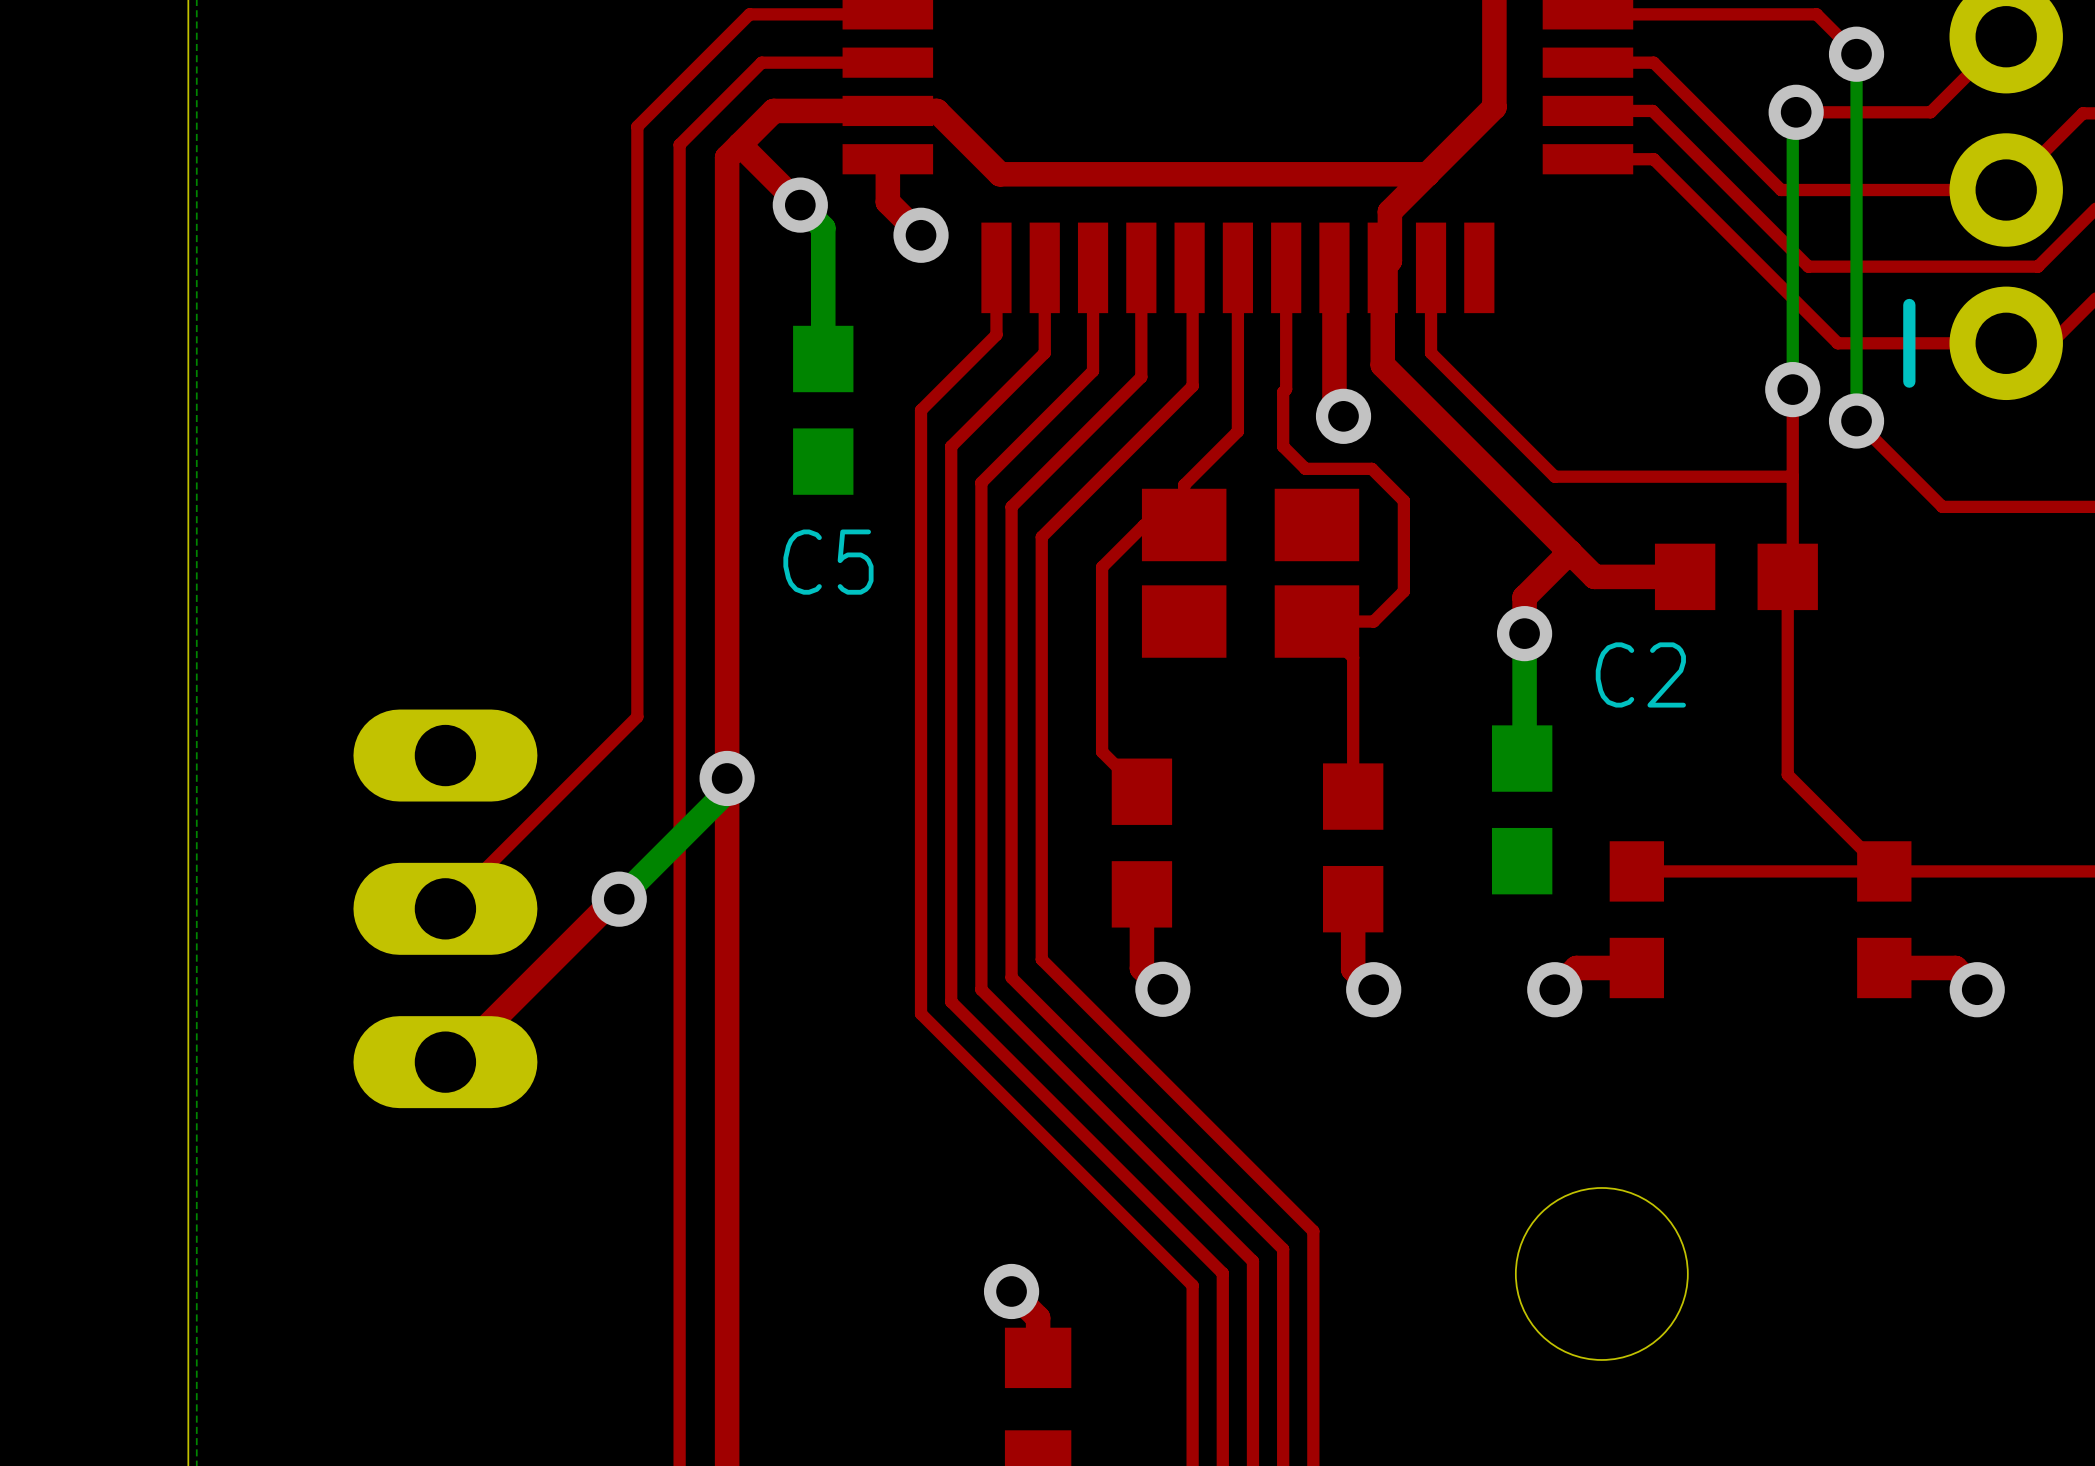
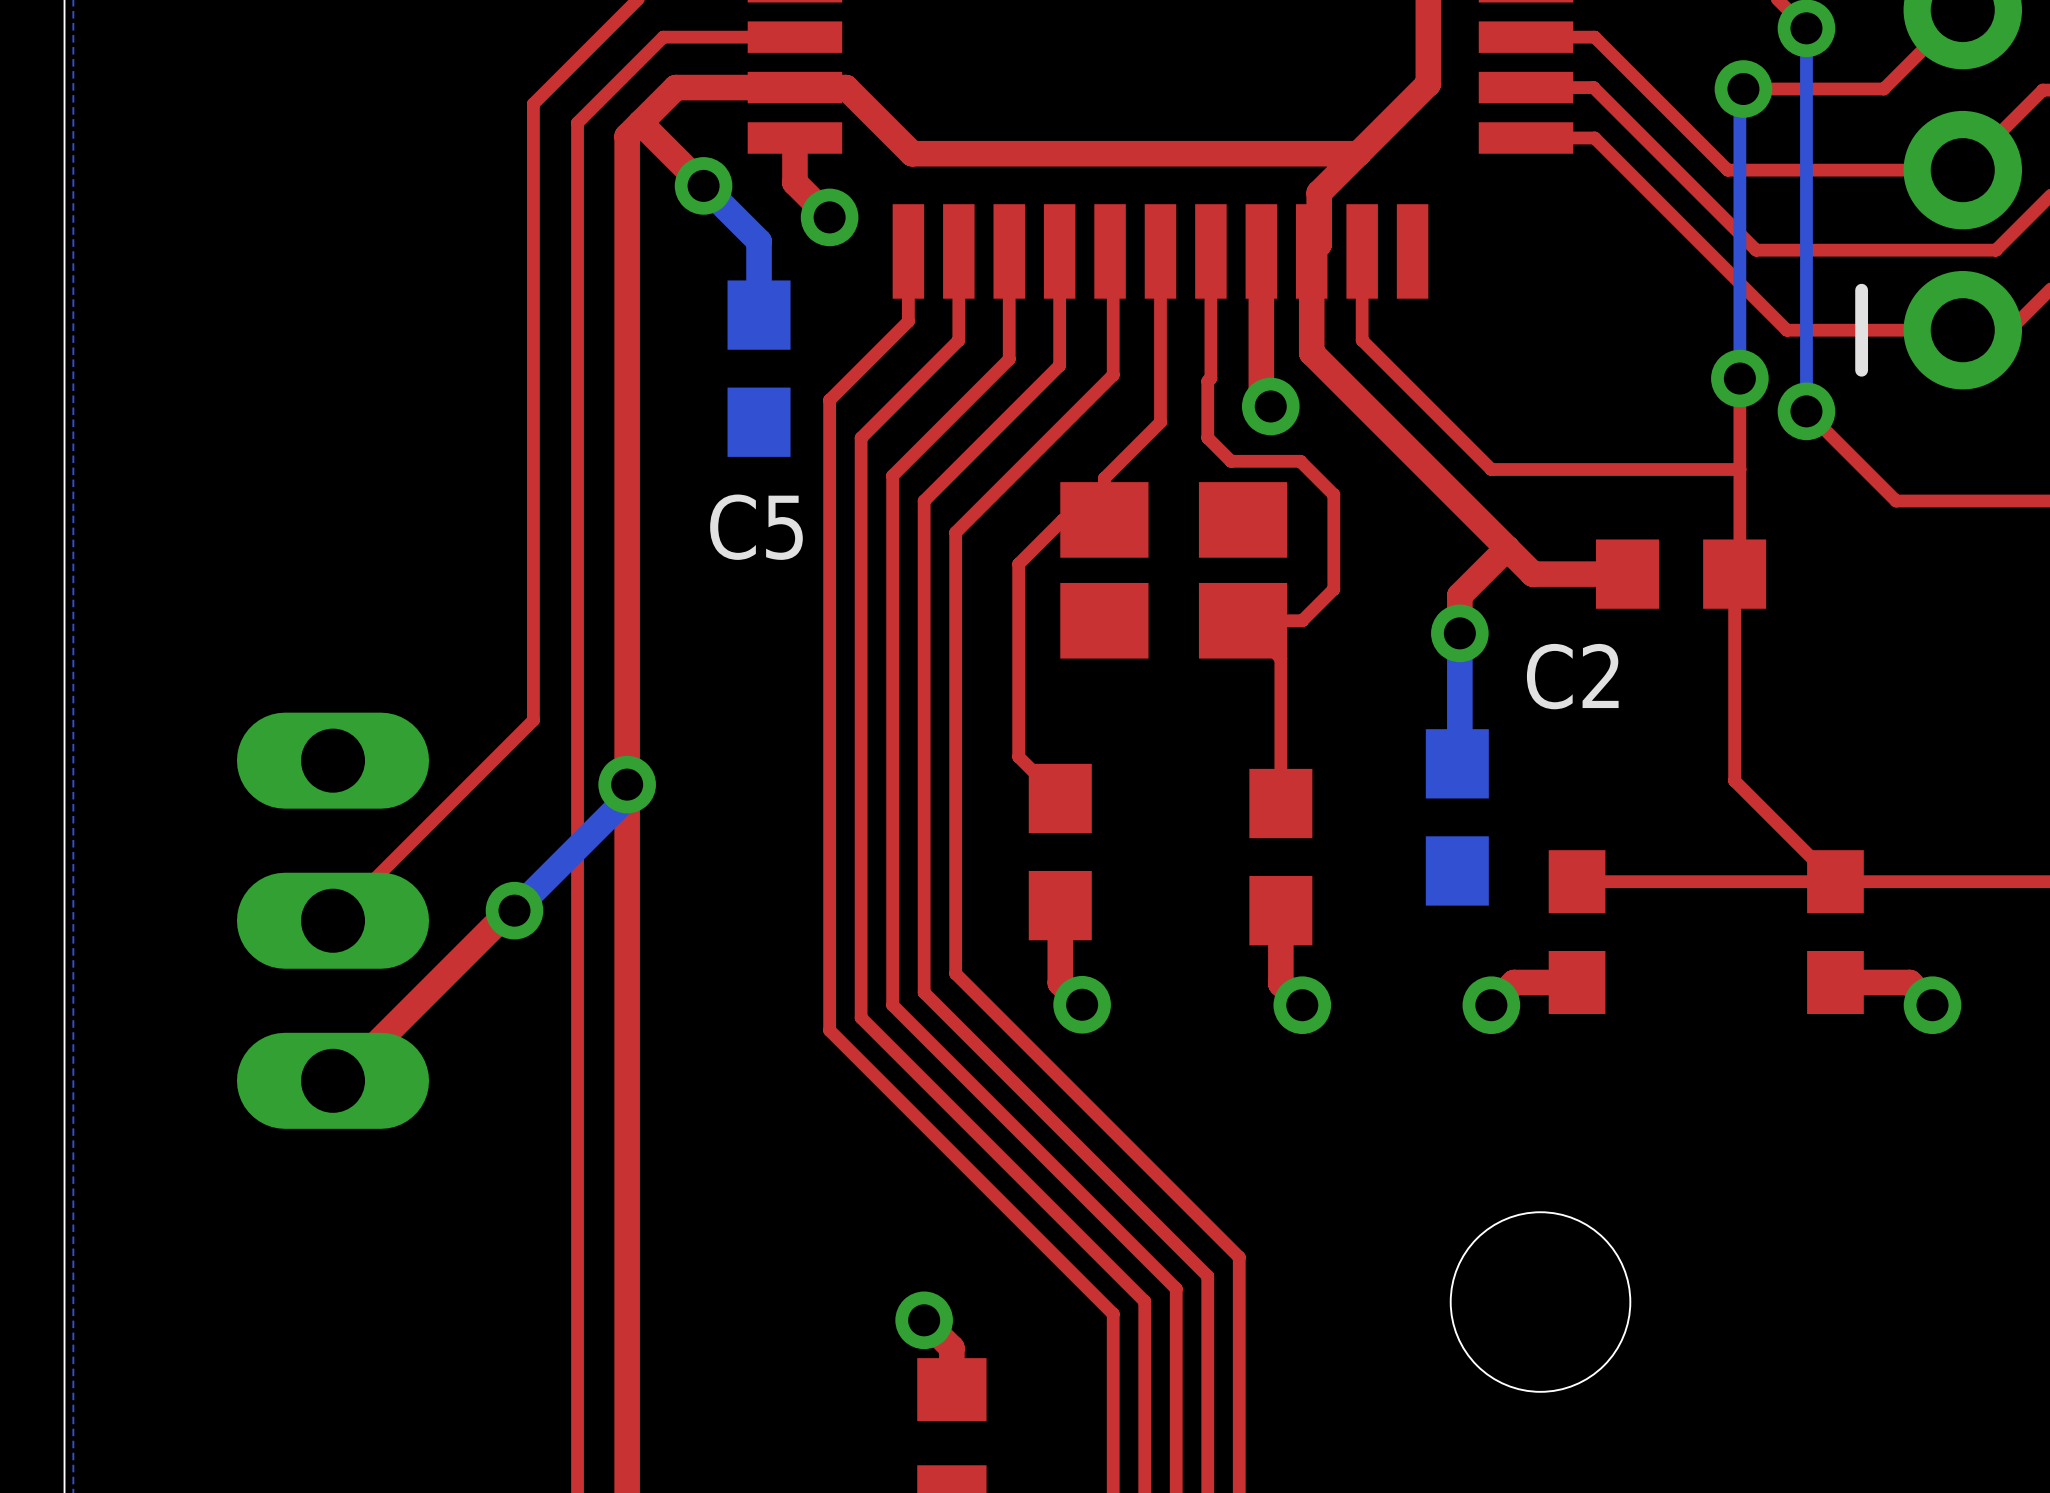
bottom track: (823, 228) (823, 359) -> (727, 209) (759, 241) (759, 315)
C5 position: (823, 410) -> (759, 368)

